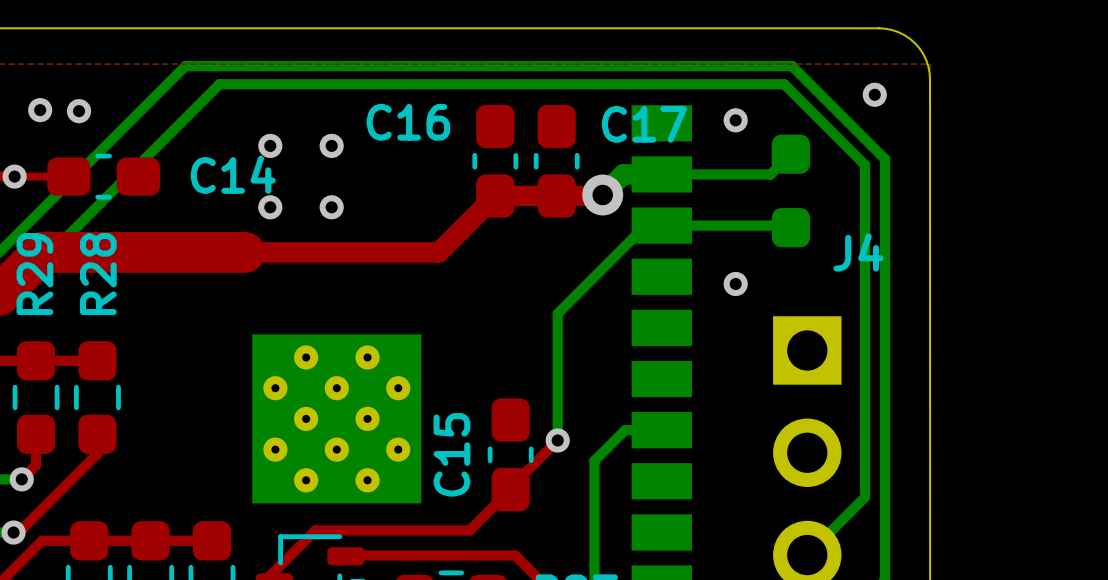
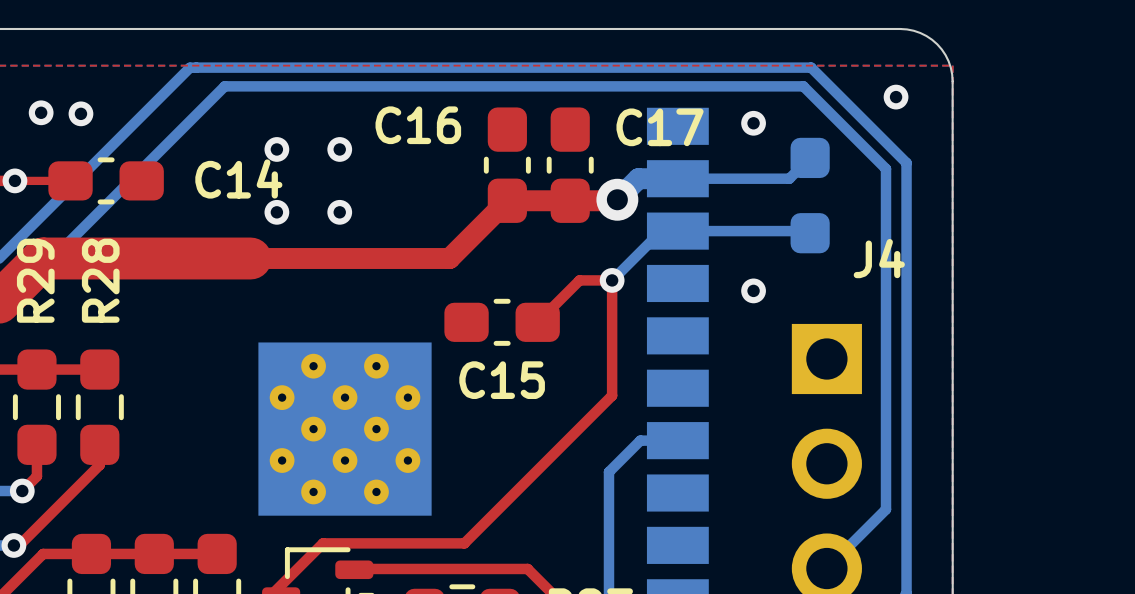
bottom track: (597, 273) (557, 313) (557, 440) -> none
top track: (557, 440) (510, 487) -> none
via position: (557, 440) -> (612, 280)
C15 name position: C15 (451, 454) -> C15 (502, 380)
C15 rotation: 0° (510, 454) -> 90° clockwise (502, 322)
C15 position: (510, 454) -> (502, 322)
top track: (510, 489) (469, 530) (453, 530) -> (537, 322) (579, 280) (612, 280) (612, 395) (464, 543)

